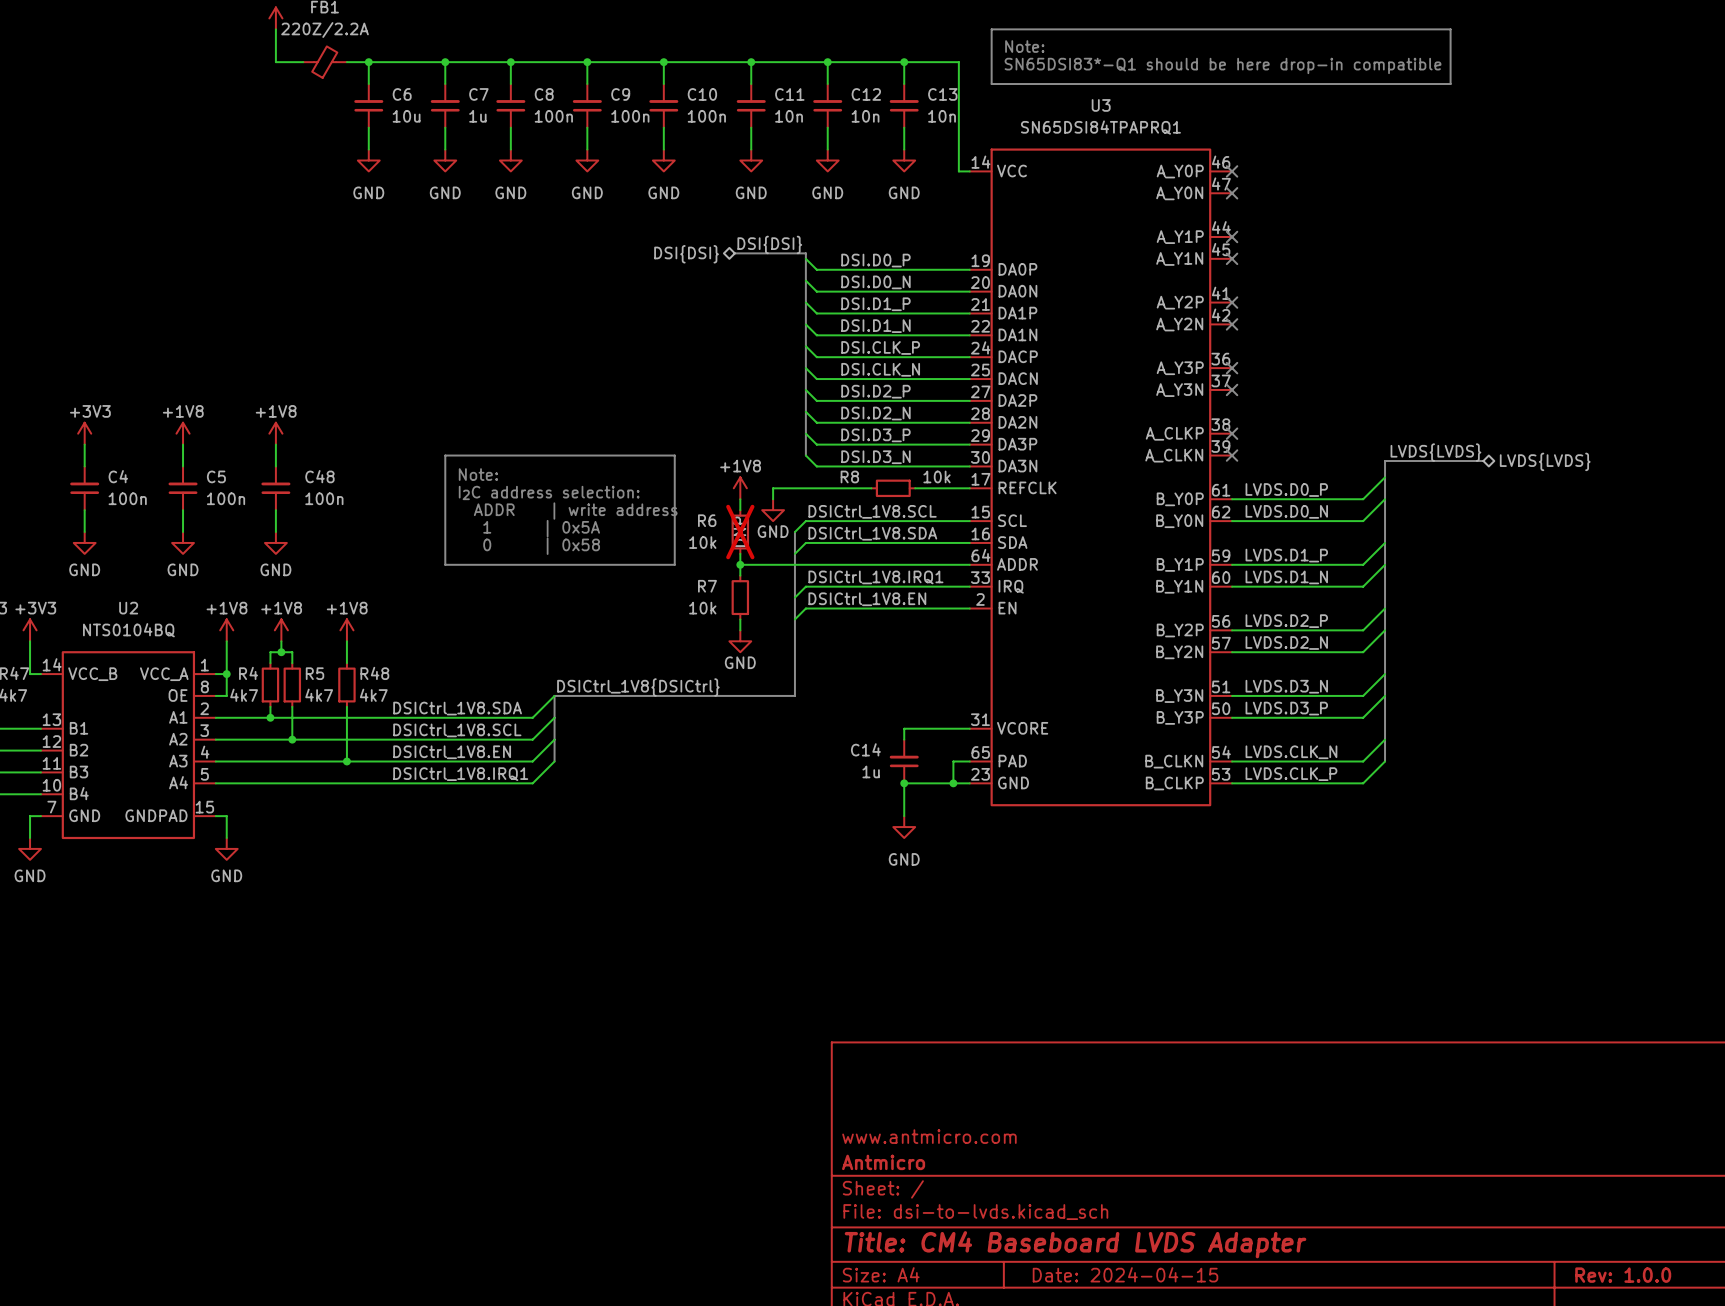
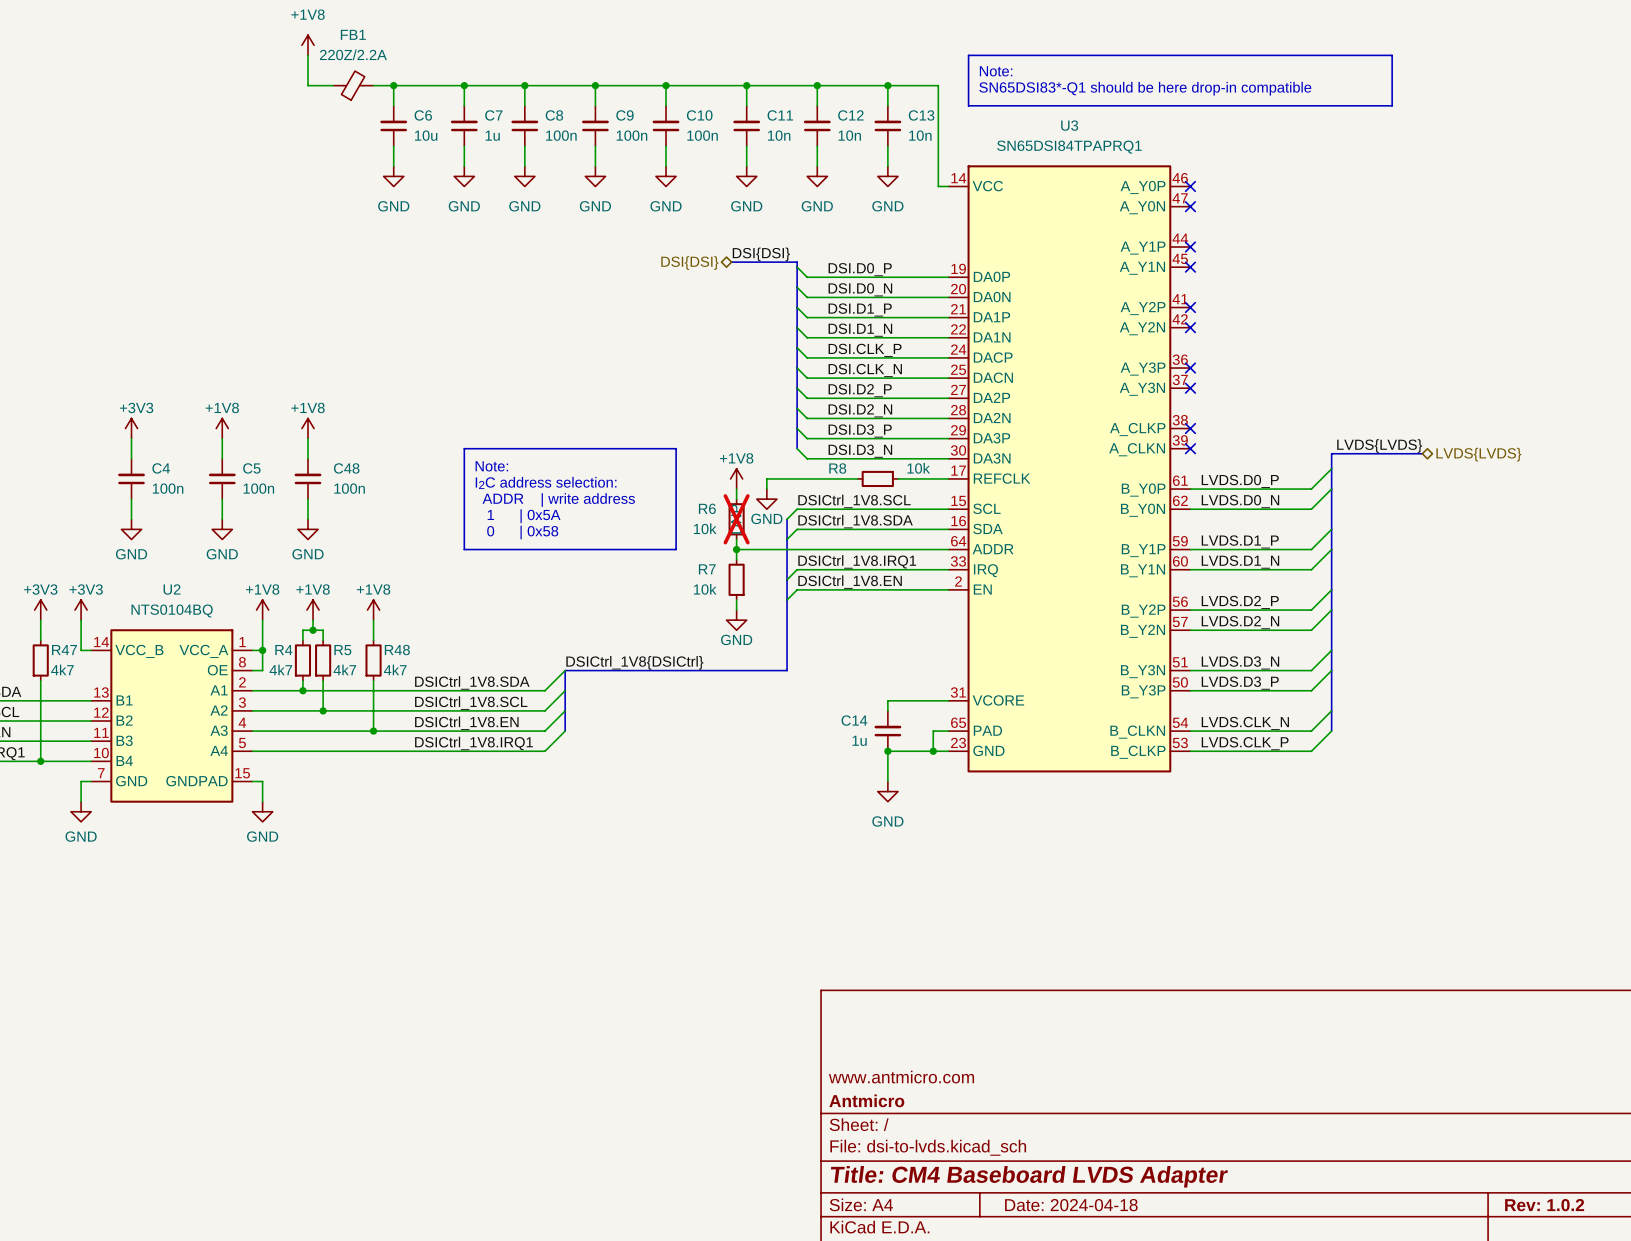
title block: Date: 2024-04-15 (1125, 1274) -> Date: 2024-04-18 (1071, 1205)
title block: Rev: 1.0.0 (1623, 1275) -> Rev: 1.0.2 (1544, 1205)

